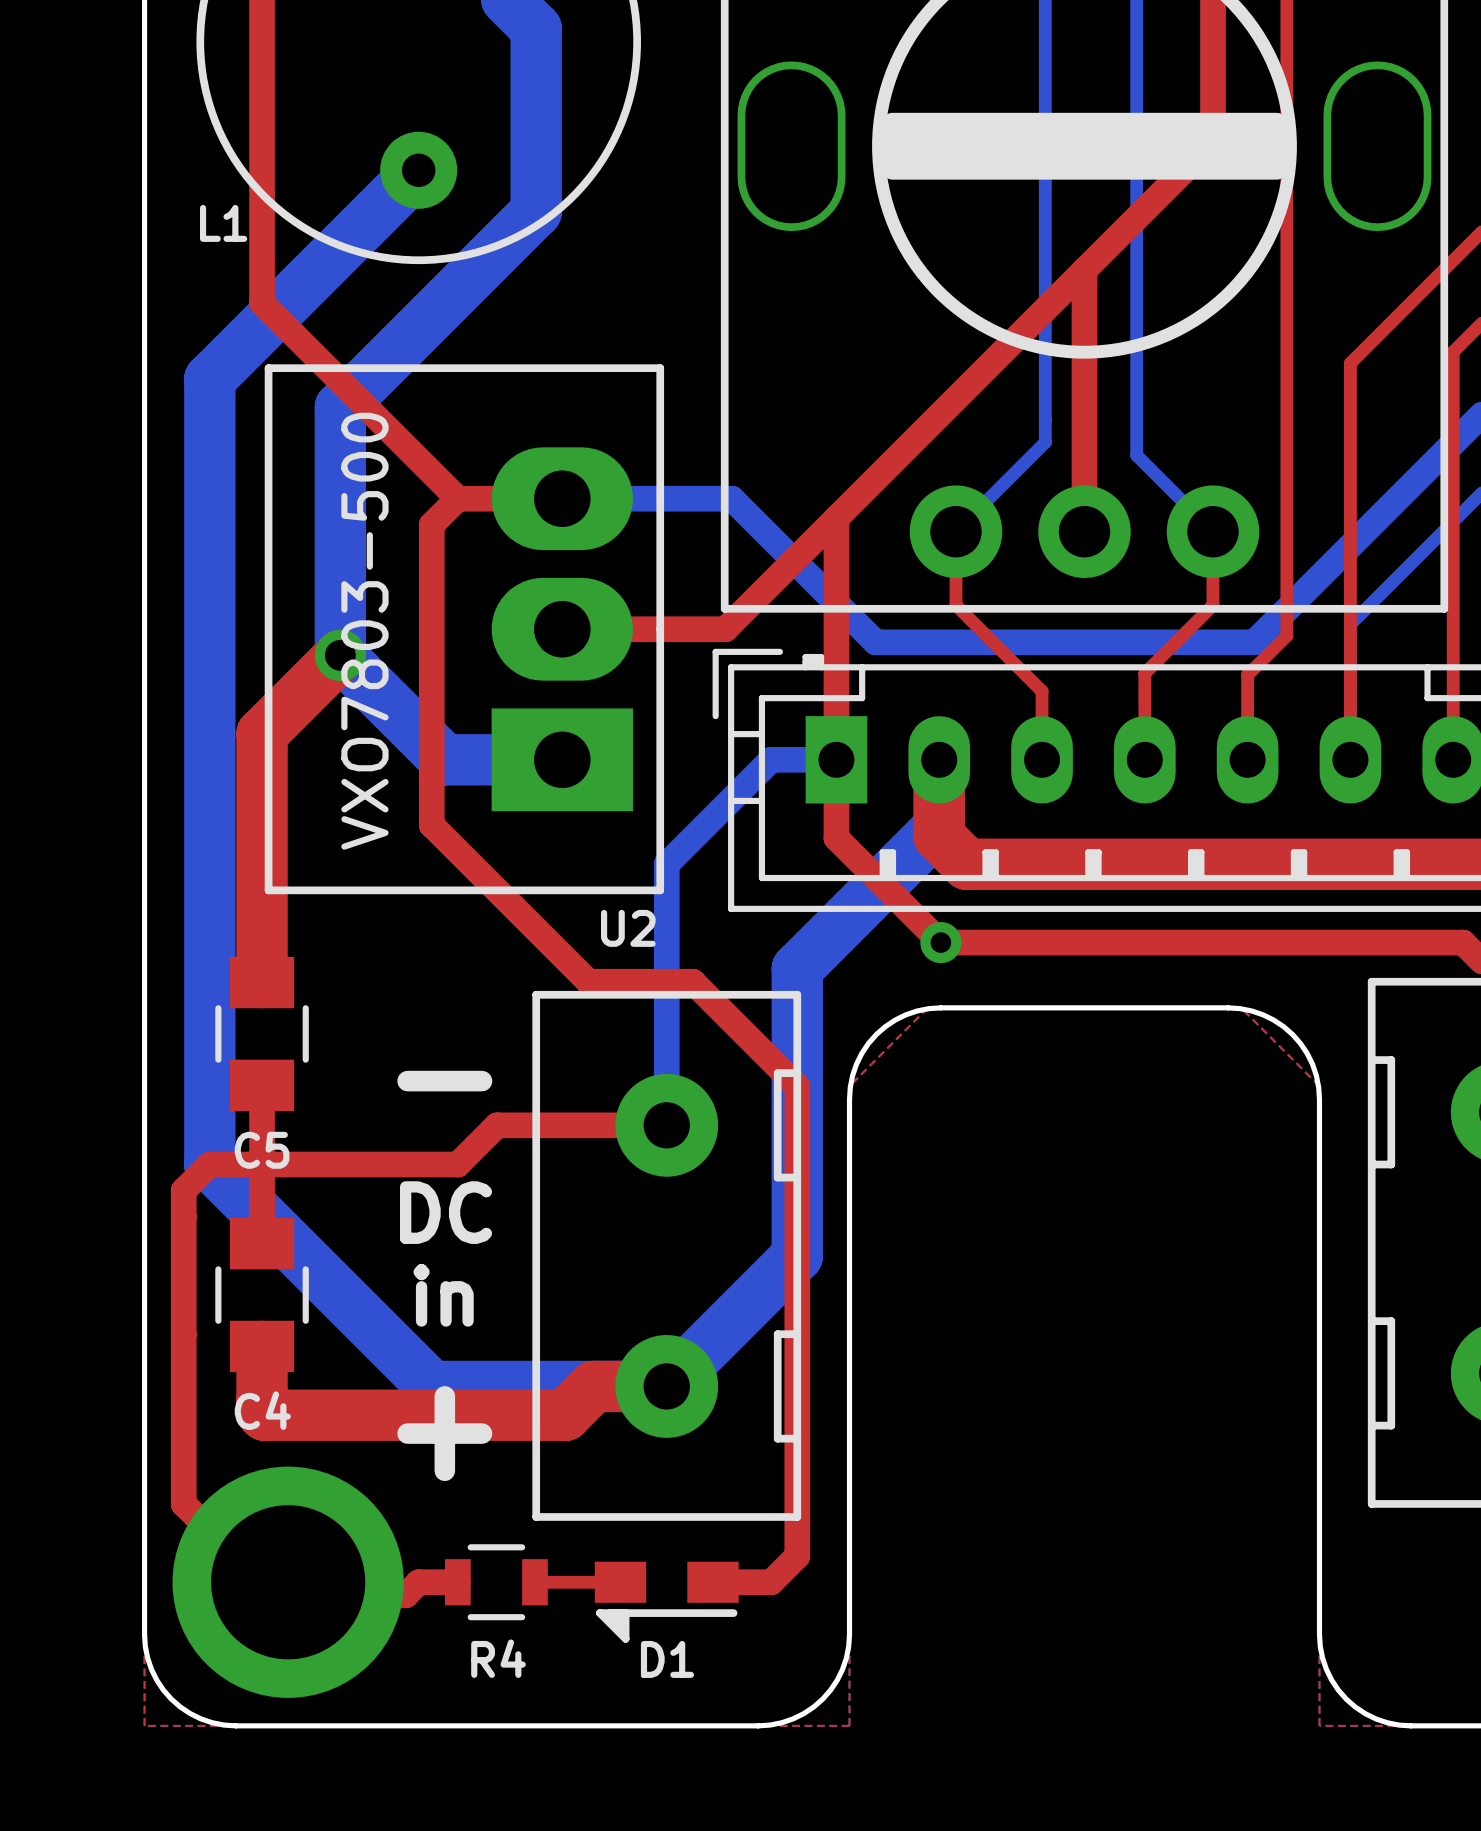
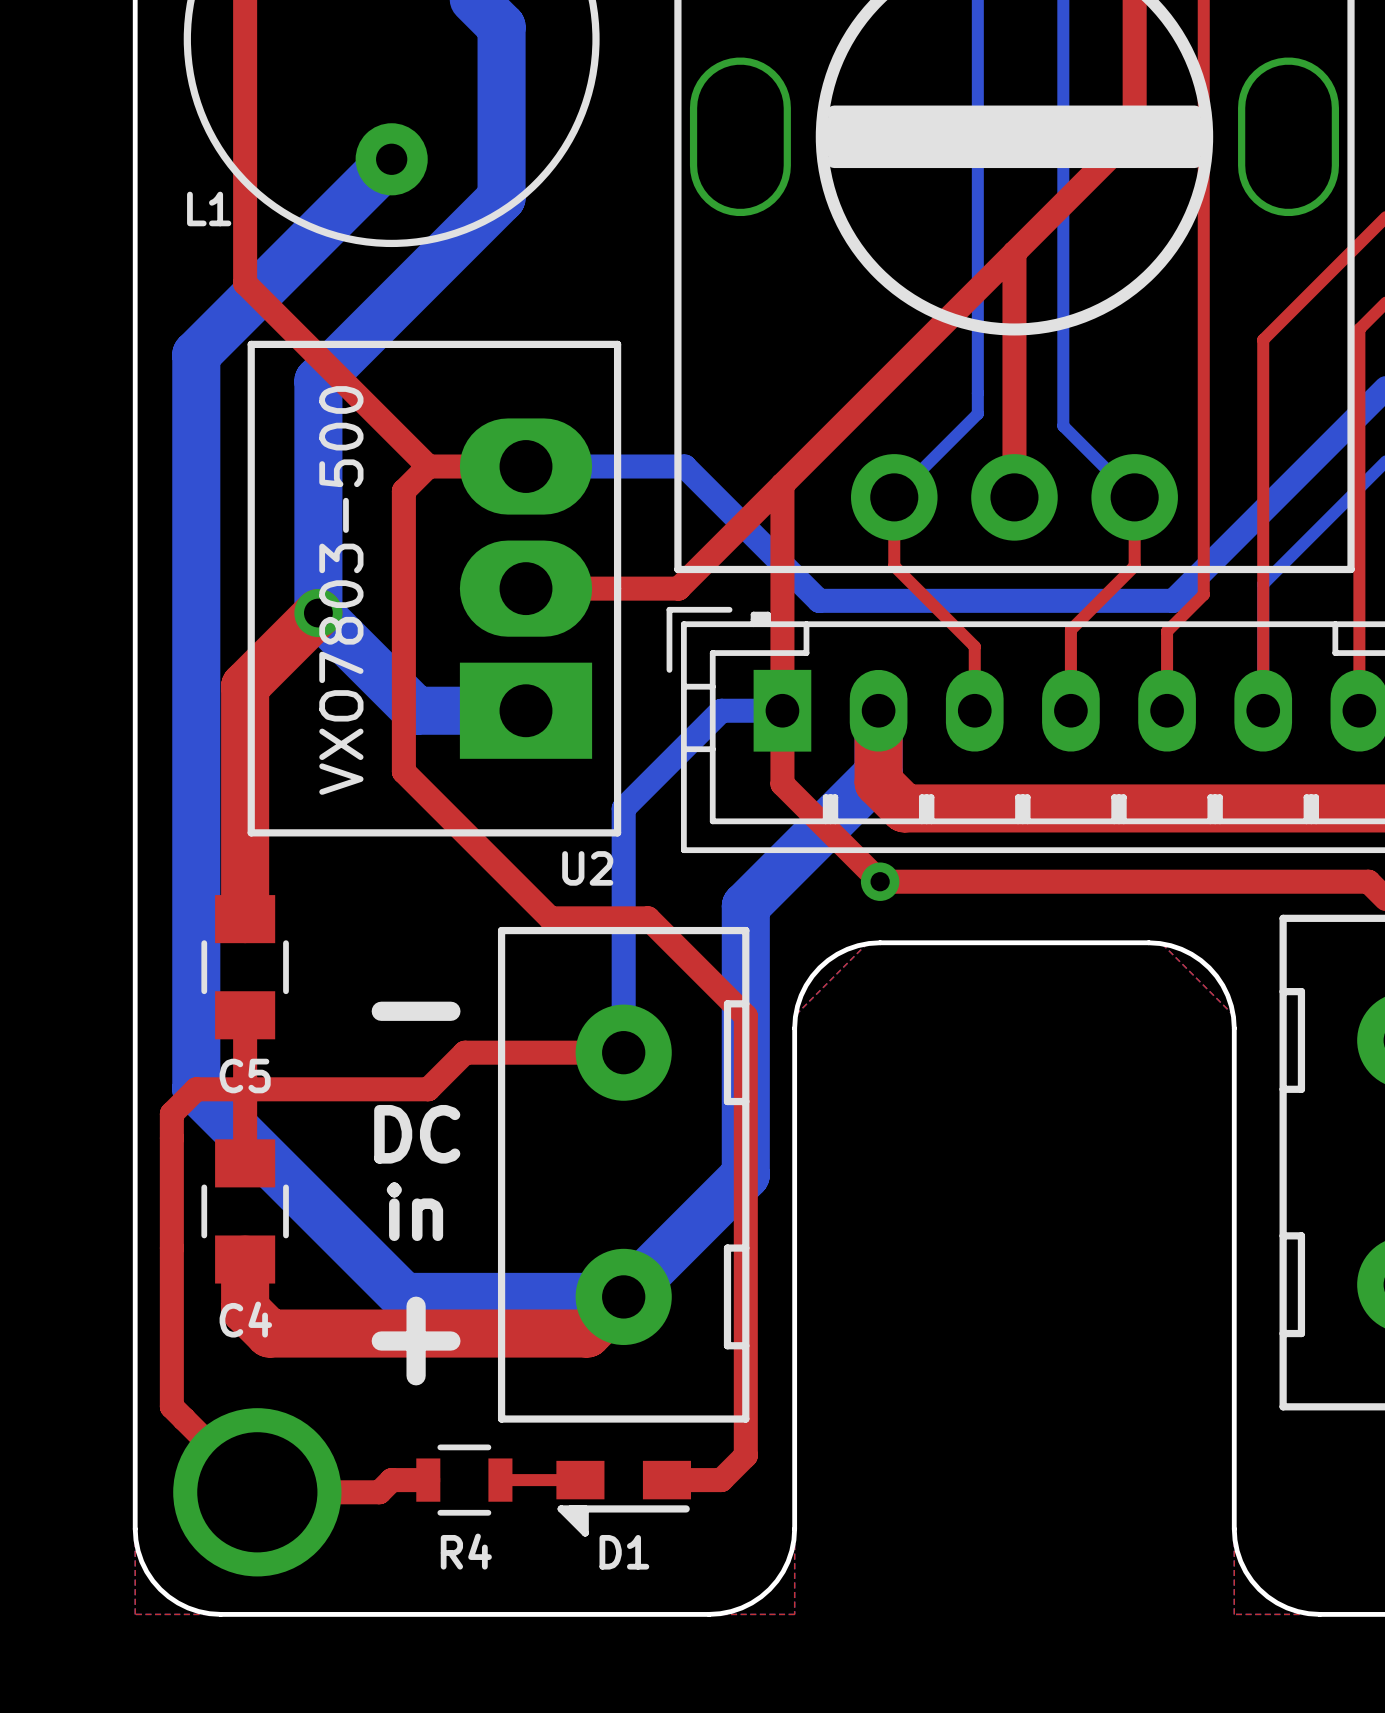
top track: (666, 1386) (594, 1386) (565, 1415) (264, 1415) (262, 1412) (262, 1399) -> (623, 1296) (587, 1333) (269, 1333) (245, 1309)
part footprint: [172, 1466, 404, 1698] -> [173, 1408, 342, 1577]

